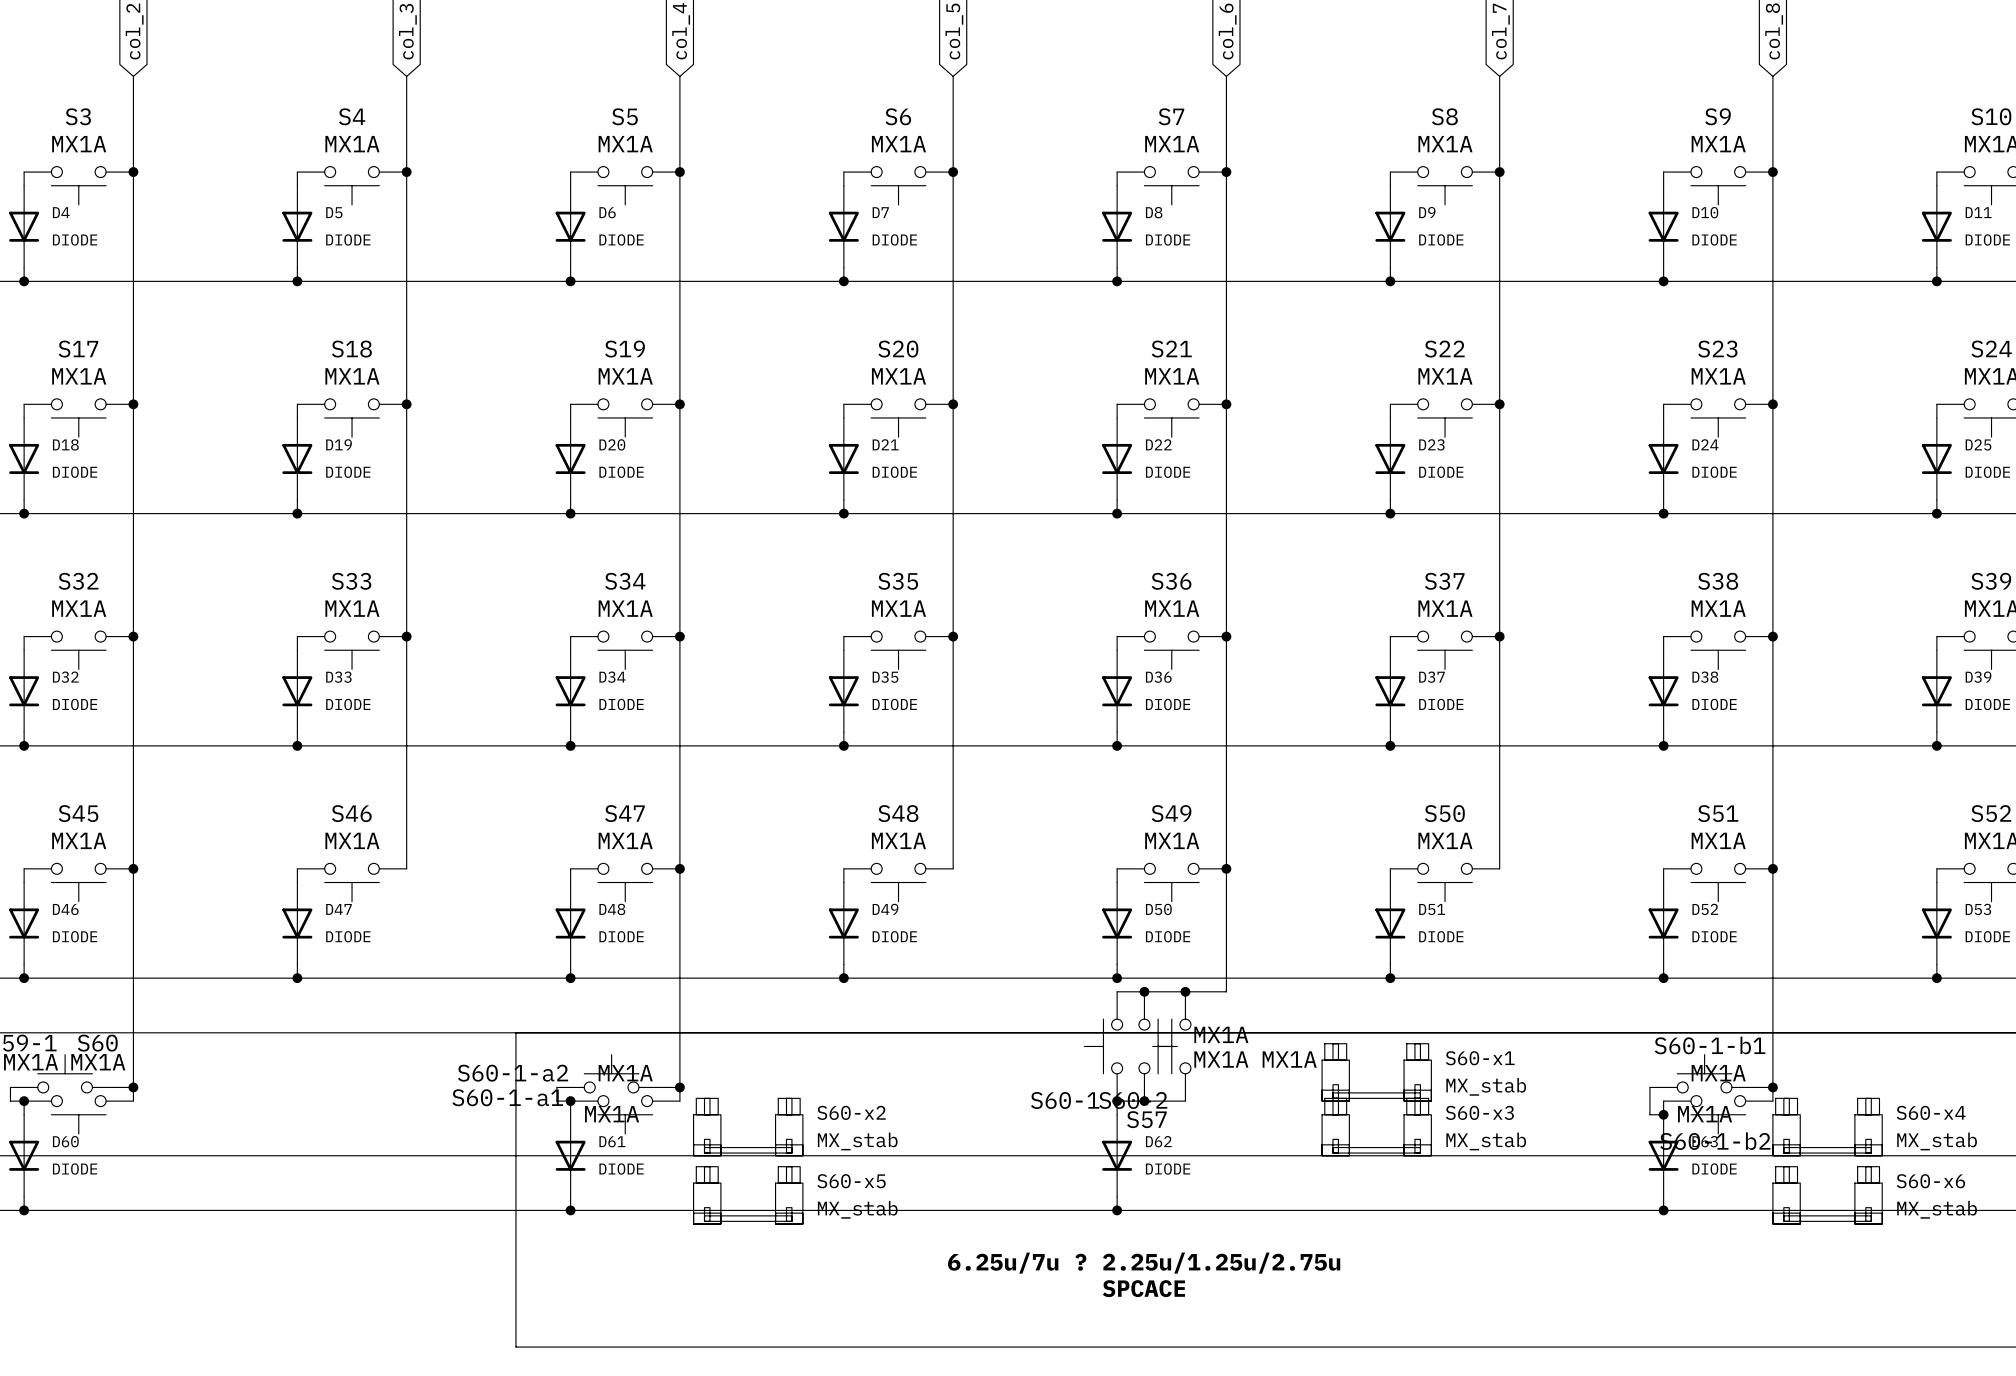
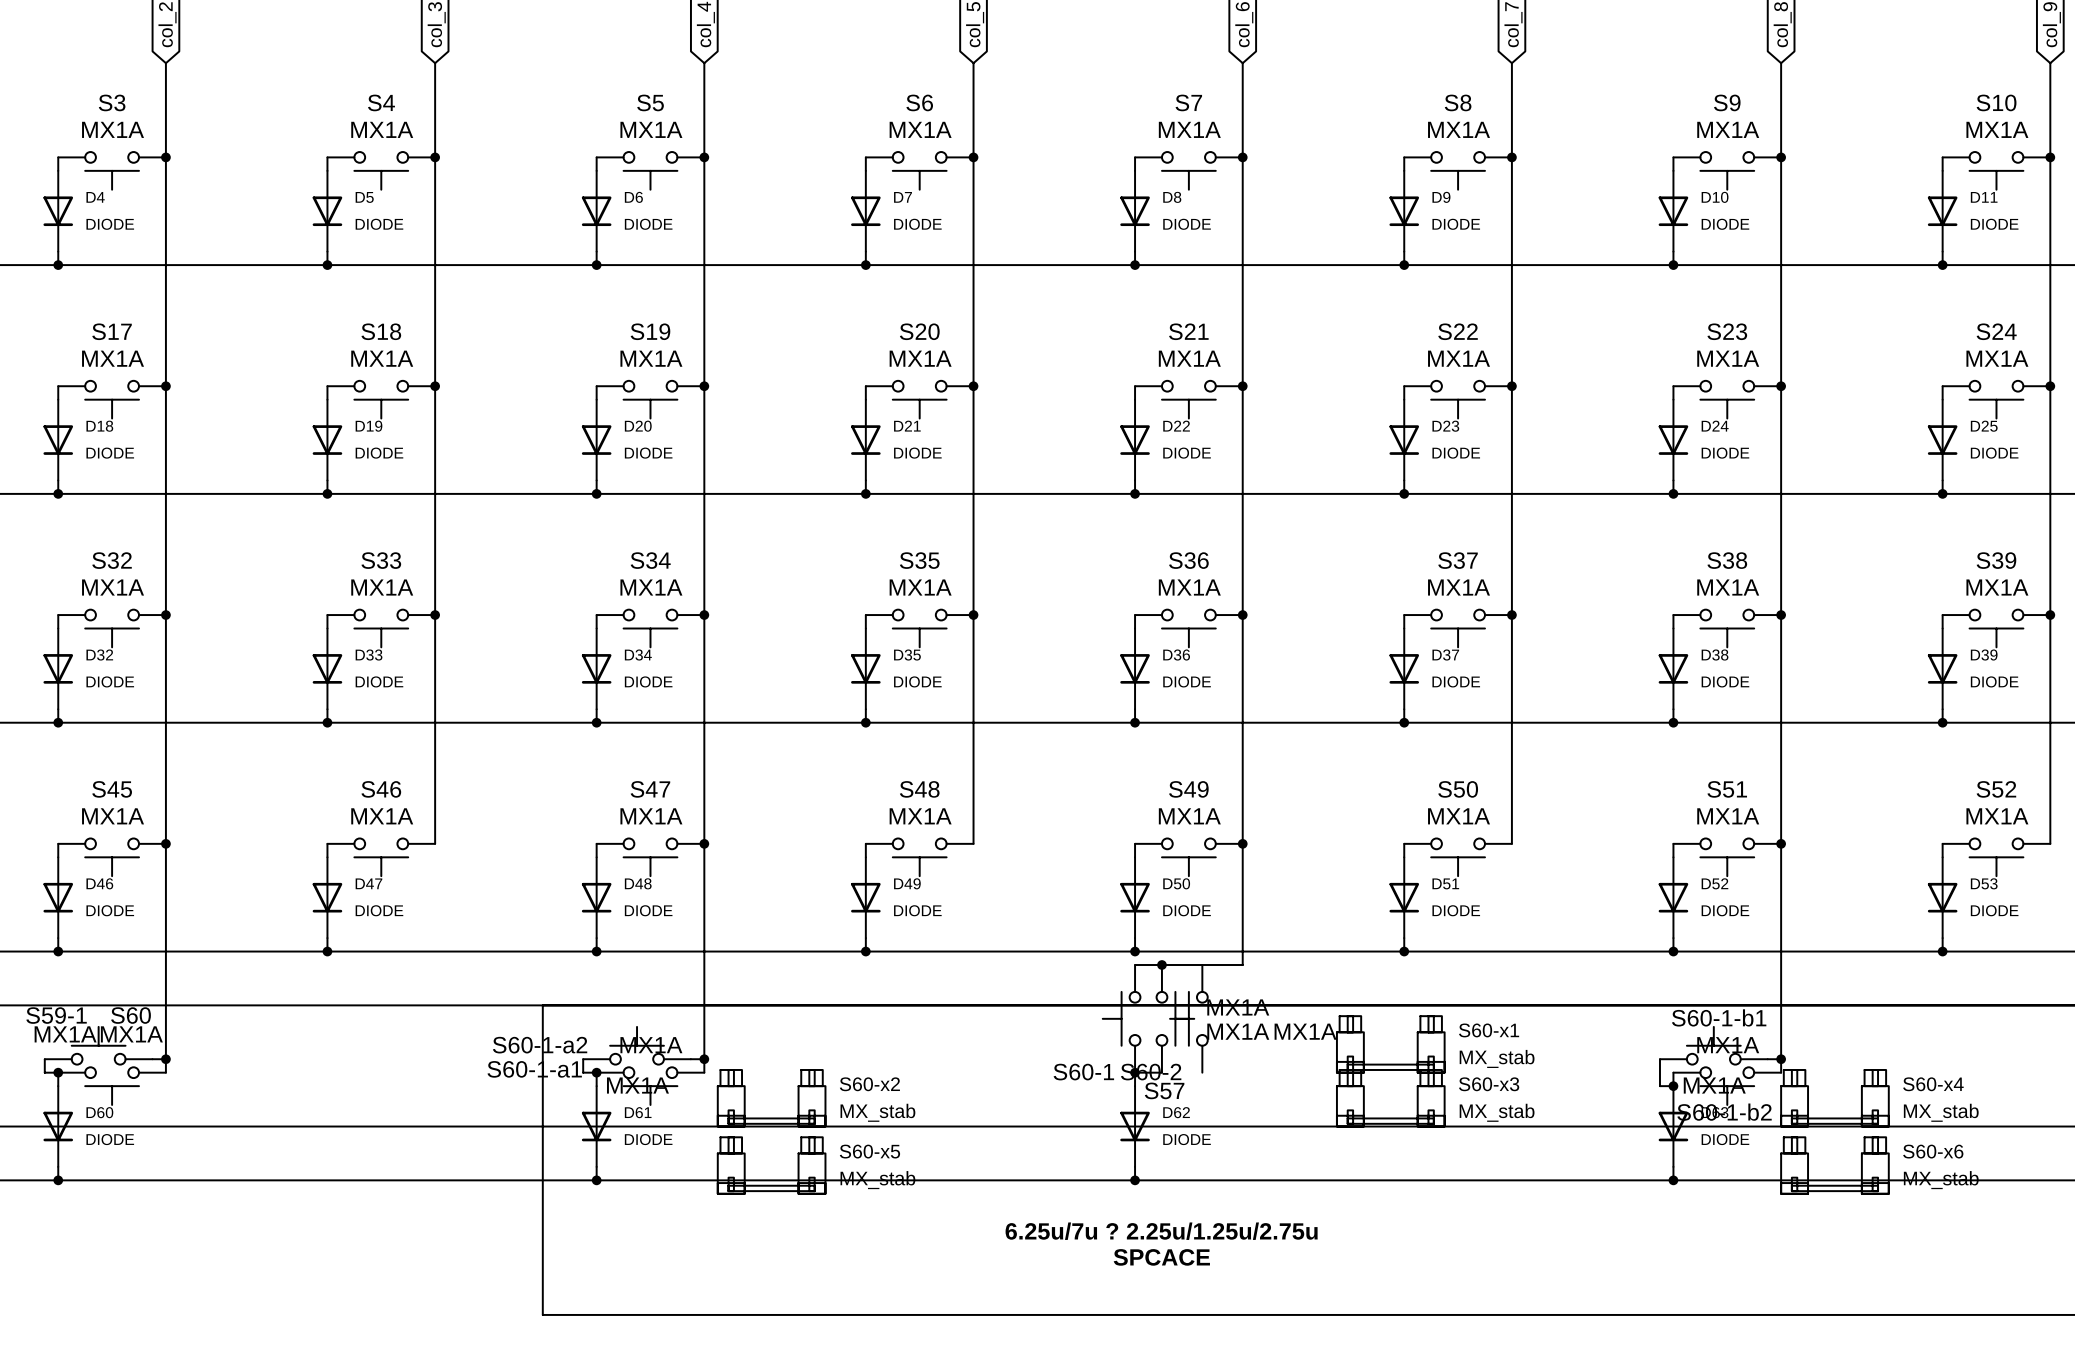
junction: (1185, 991) -> none
wire: (1144, 1101) (1185, 1101) -> none
junction: (1144, 1101) -> none

